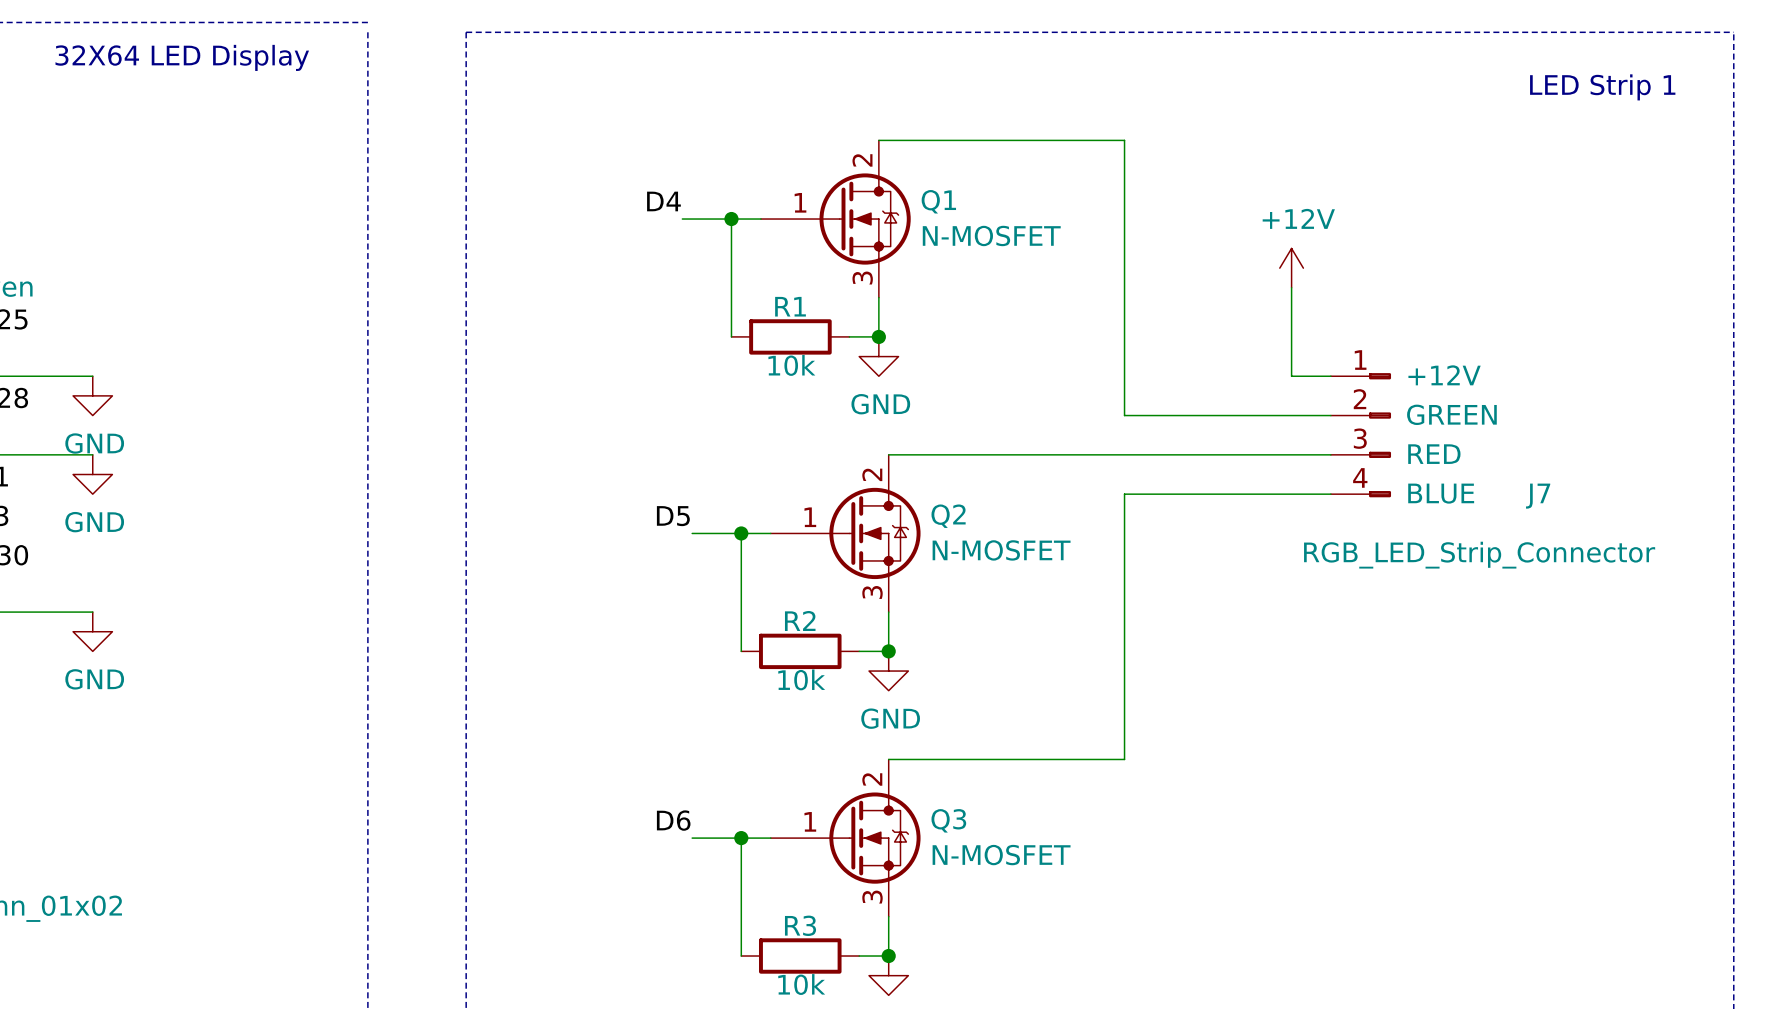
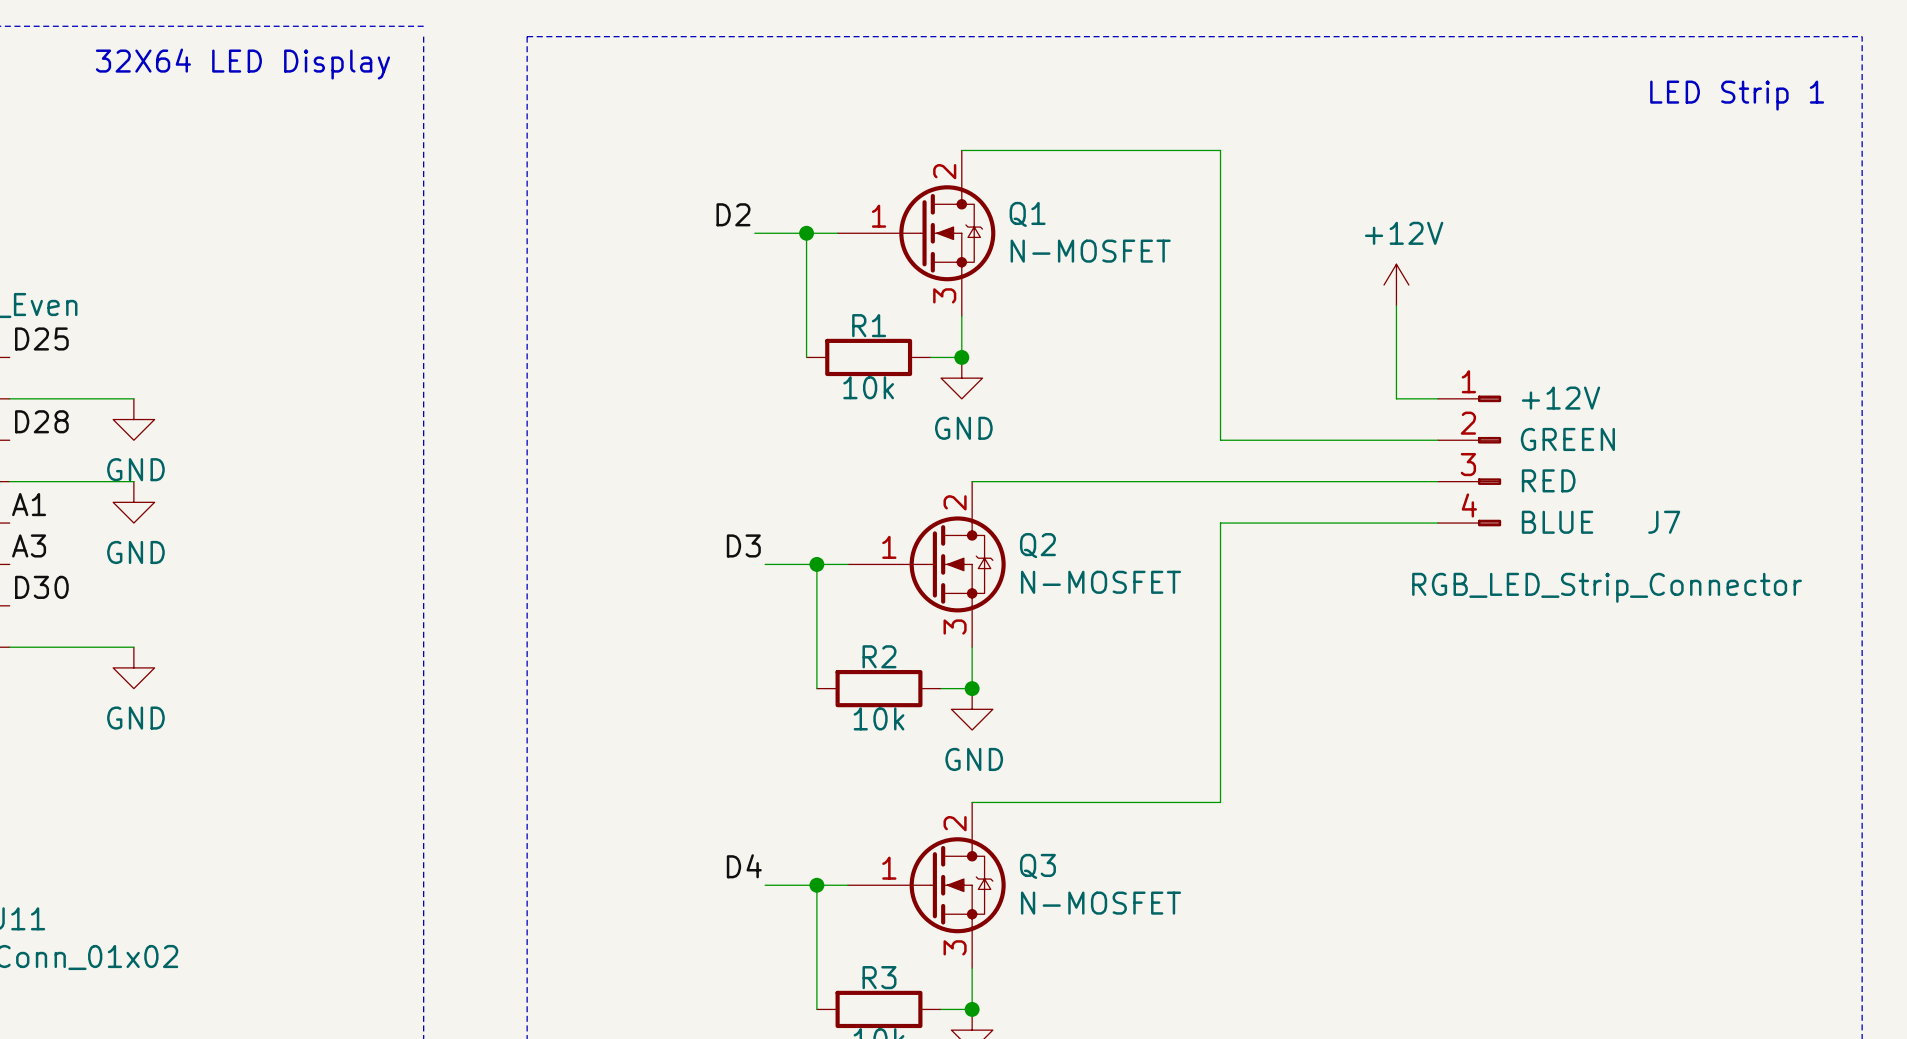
label: D4 (663, 201) -> D2 (733, 214)
label: D5 (673, 516) -> D3 (743, 545)
label: D6 (673, 820) -> D4 (744, 866)

